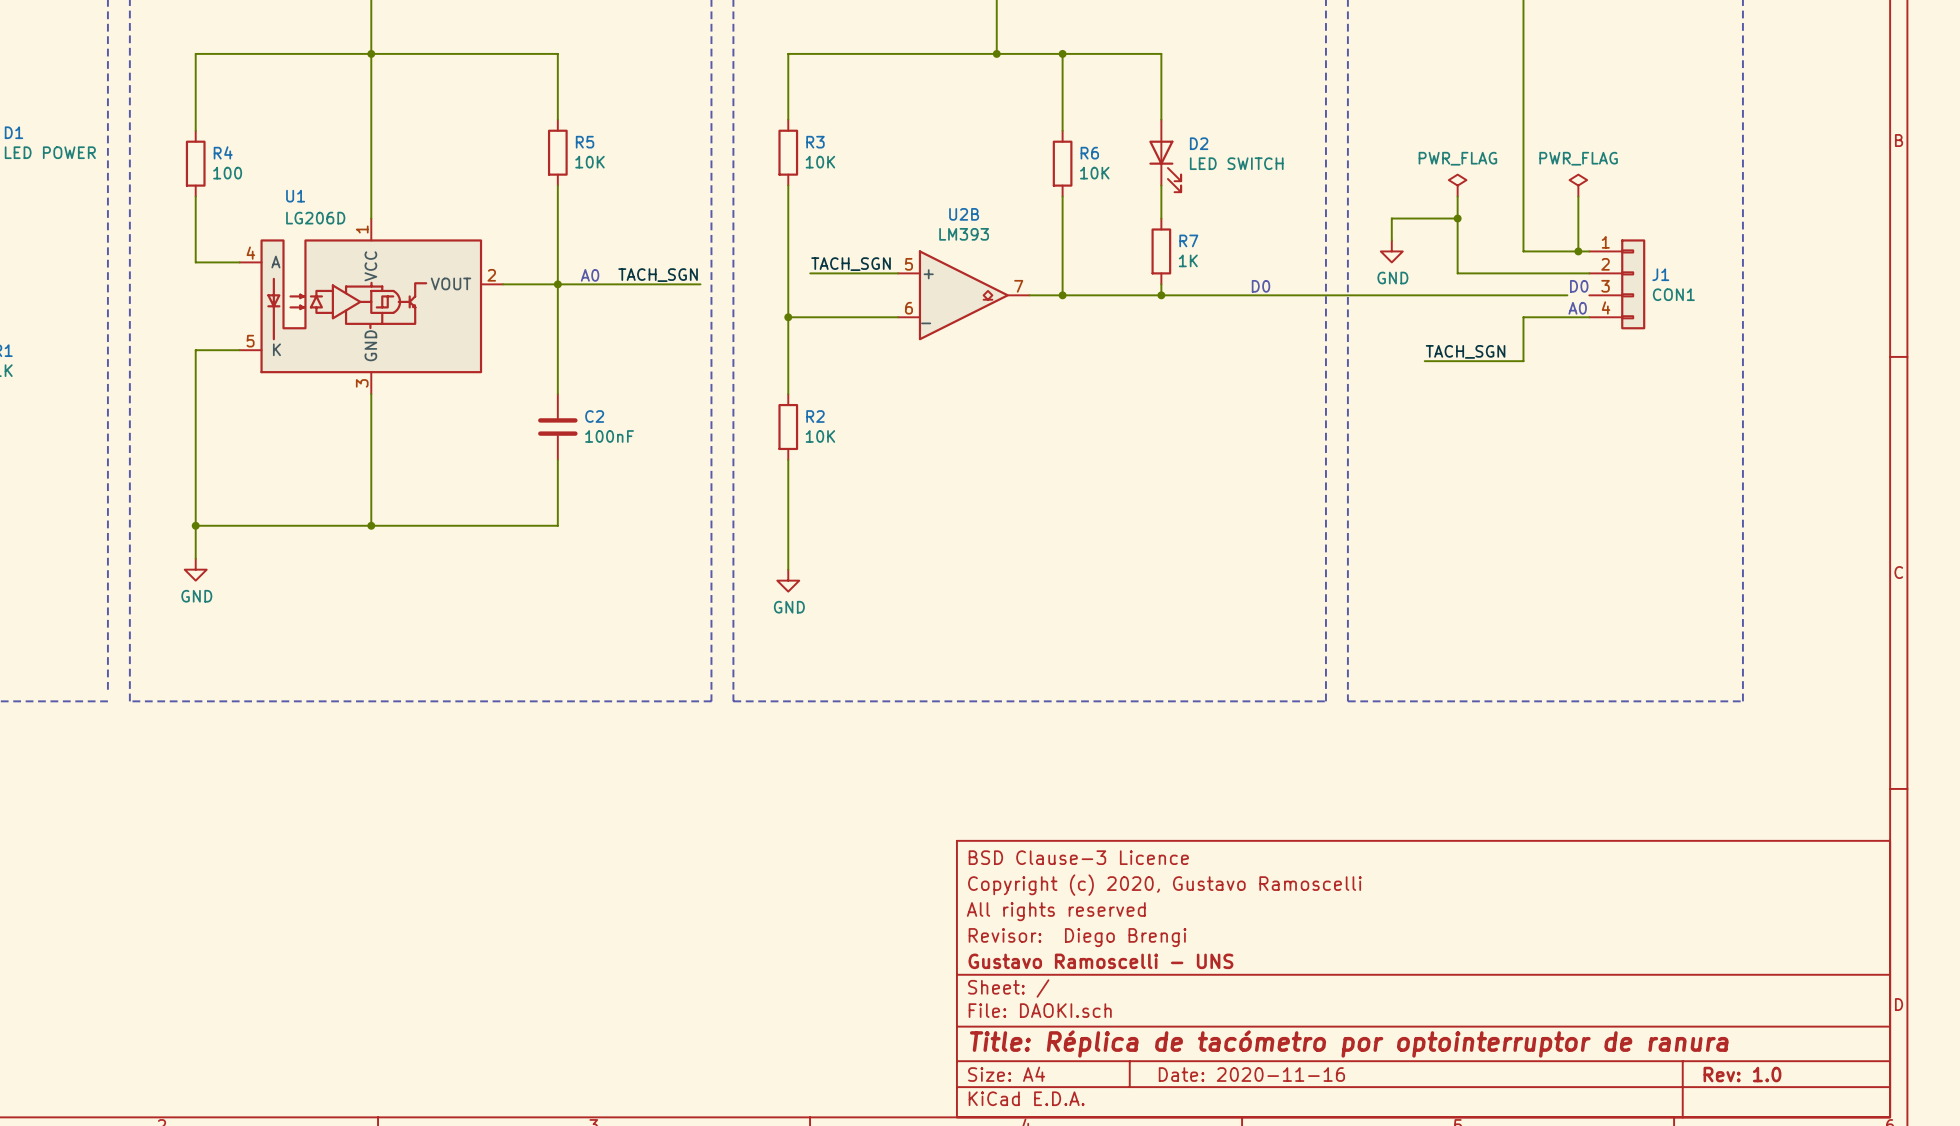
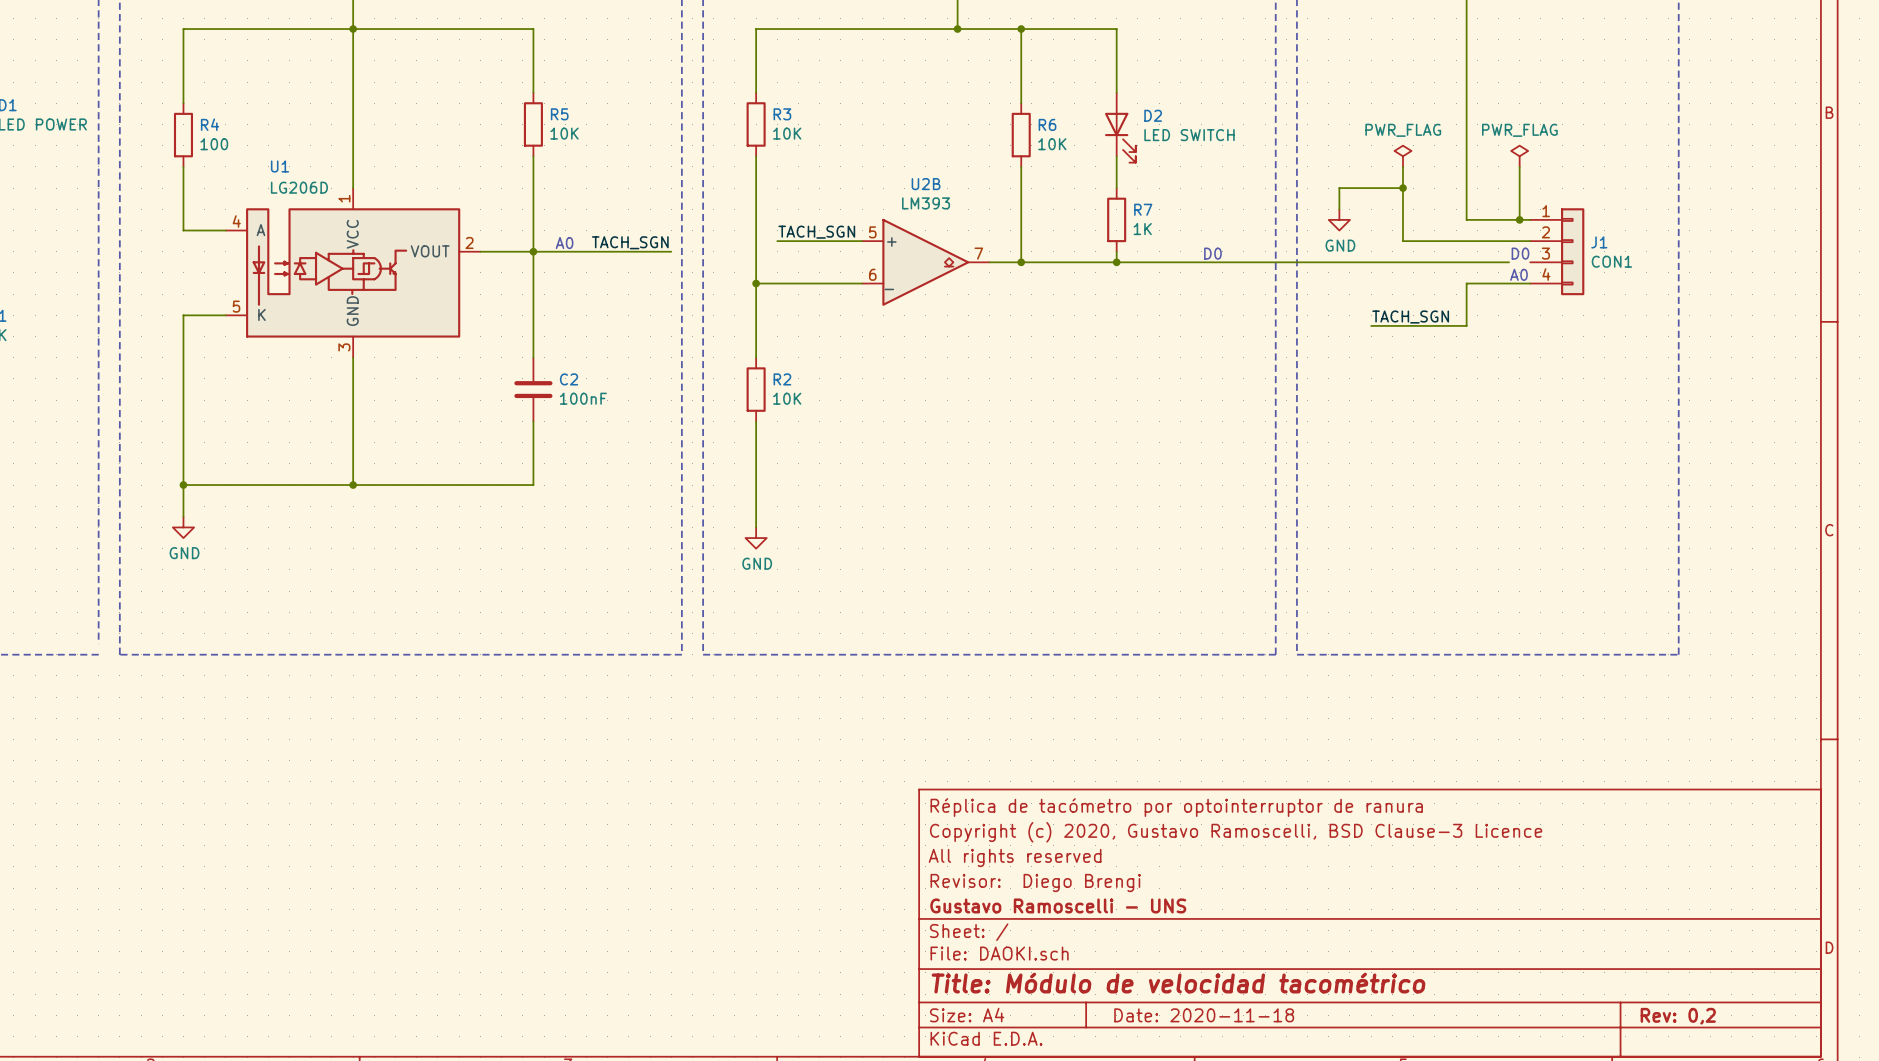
title block: BSD Clause-3 Licence (1078, 857) -> Réplica de tacómetro por optointerruptor de ranura (1176, 807)
title block: Copyright (c) 2020, Gustavo Ramoscelli (1164, 885) -> Copyright (c) 2020, Gustavo Ramoscelli, BSD Clause-3 Licence (1236, 832)
title block: Title: Réplica de tacómetro por optointerruptor de ranura (1349, 1044) -> Title: Módulo de velocidad tacométrico (1178, 983)
title block: Date: 2020-11-16 (1251, 1074) -> Date: 2020-11-18 (1204, 1015)
title block: Rev: 1.0 (1742, 1074) -> Rev: 0,2 (1678, 1016)

